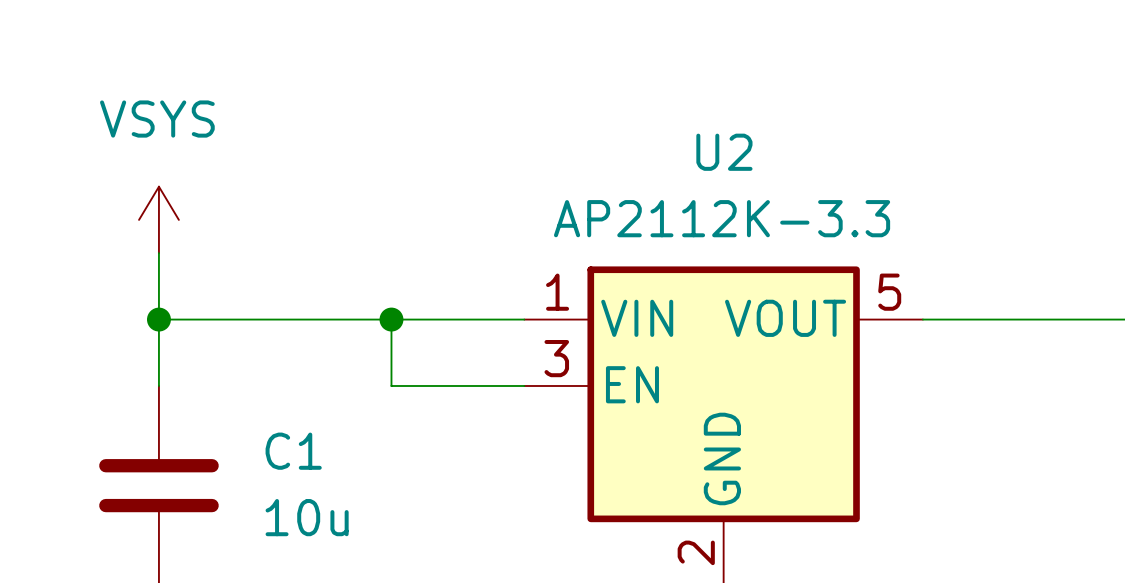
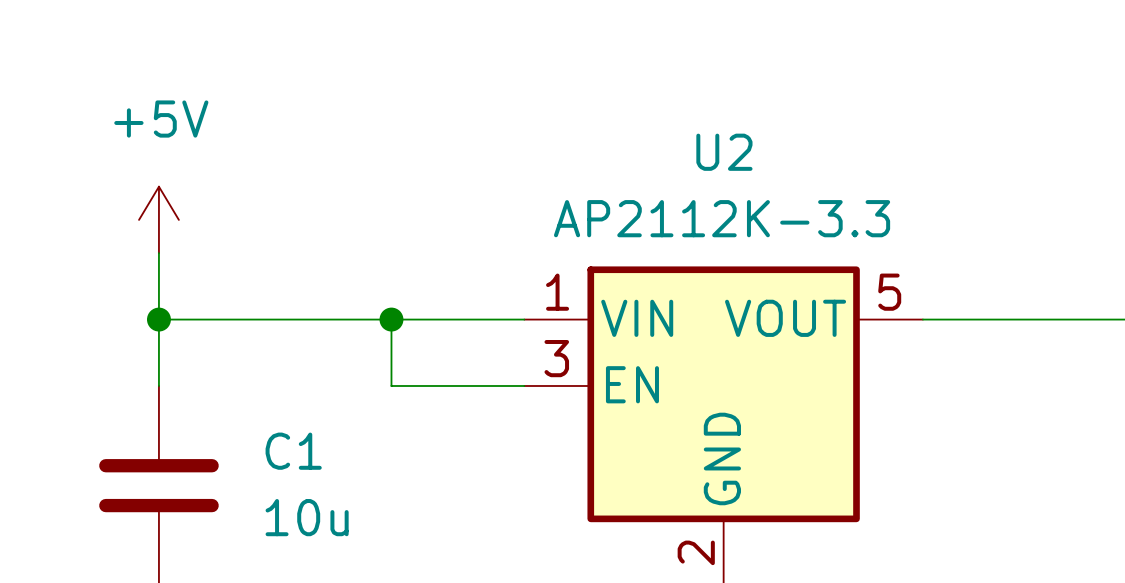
power symbol: VSYS (158, 219) -> +5V (158, 219)

